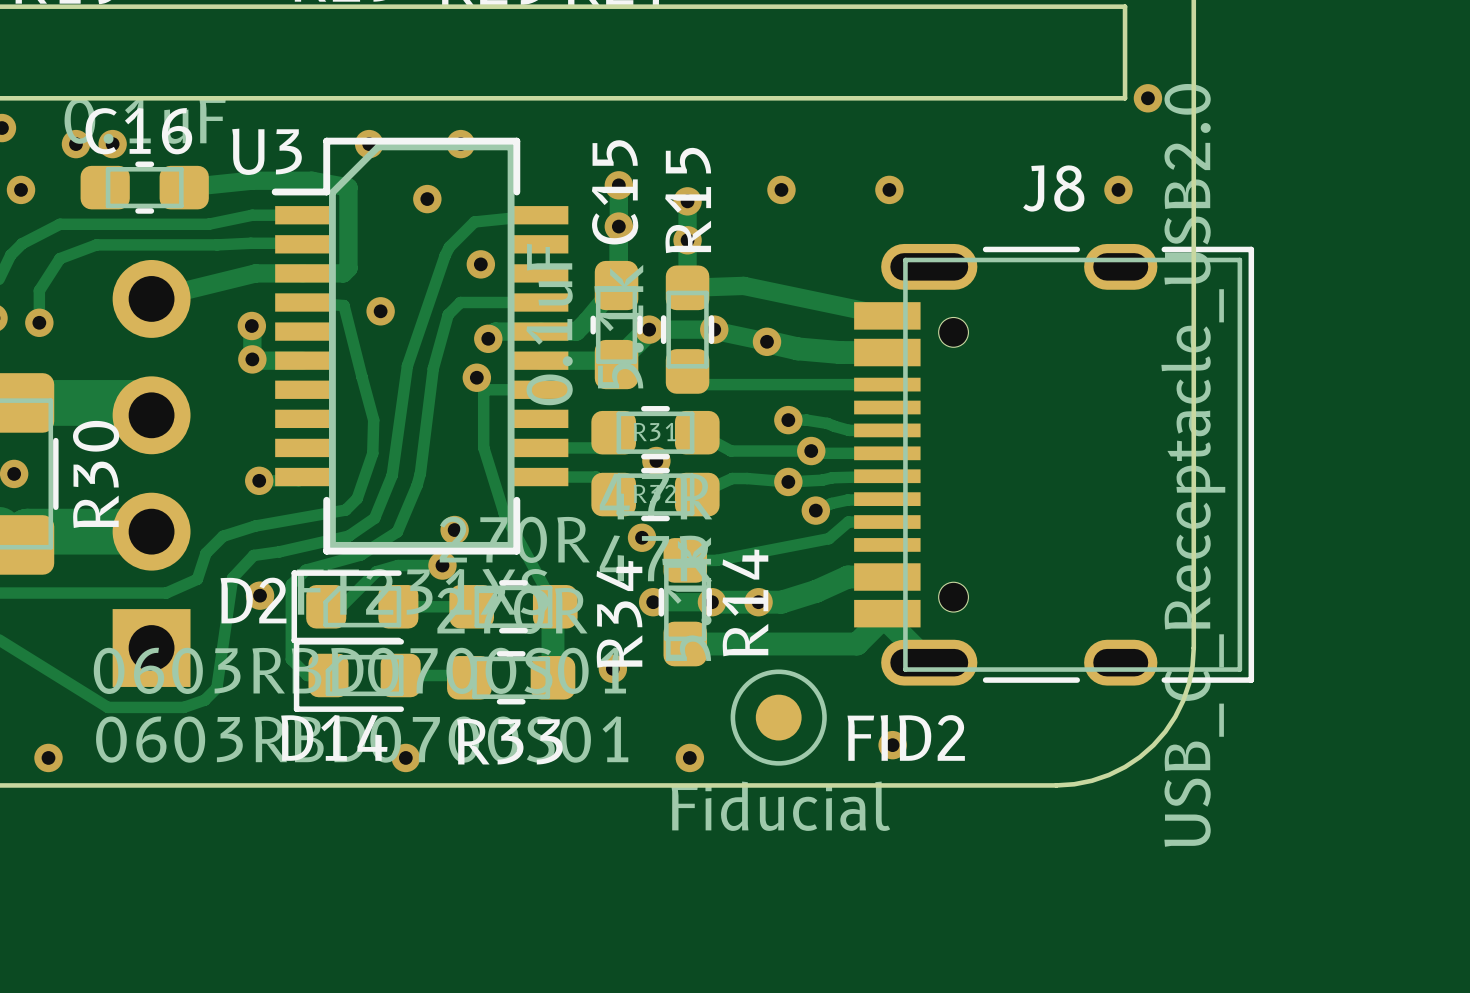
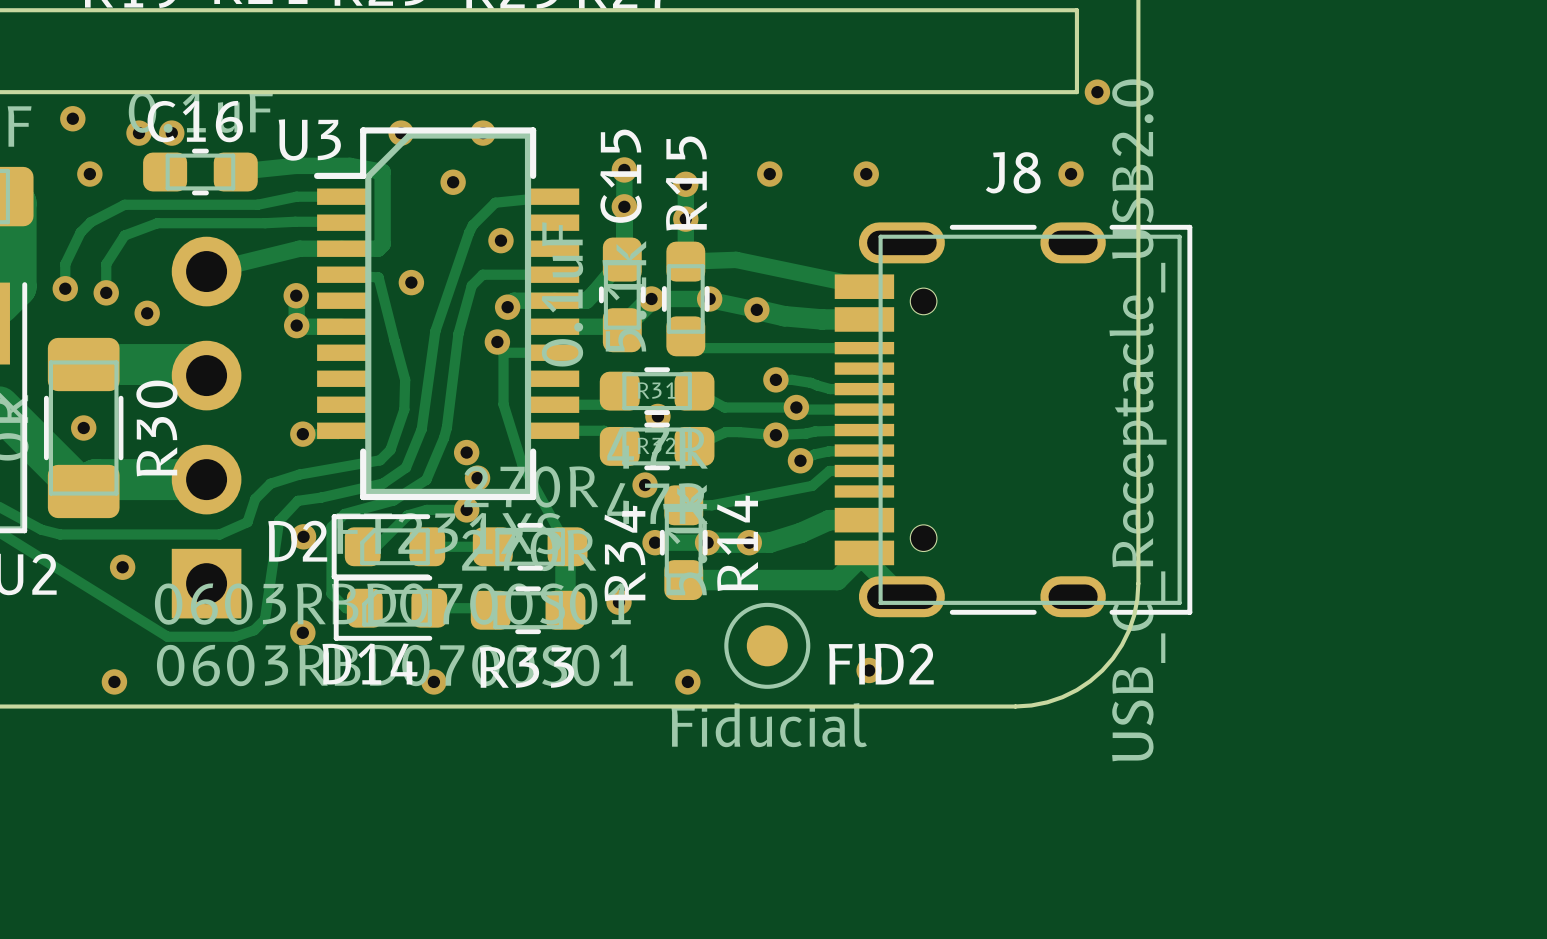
via: none -> (147, 313)
via: none -> (466, 452)
via: none -> (122, 567)
via: none -> (302, 632)

